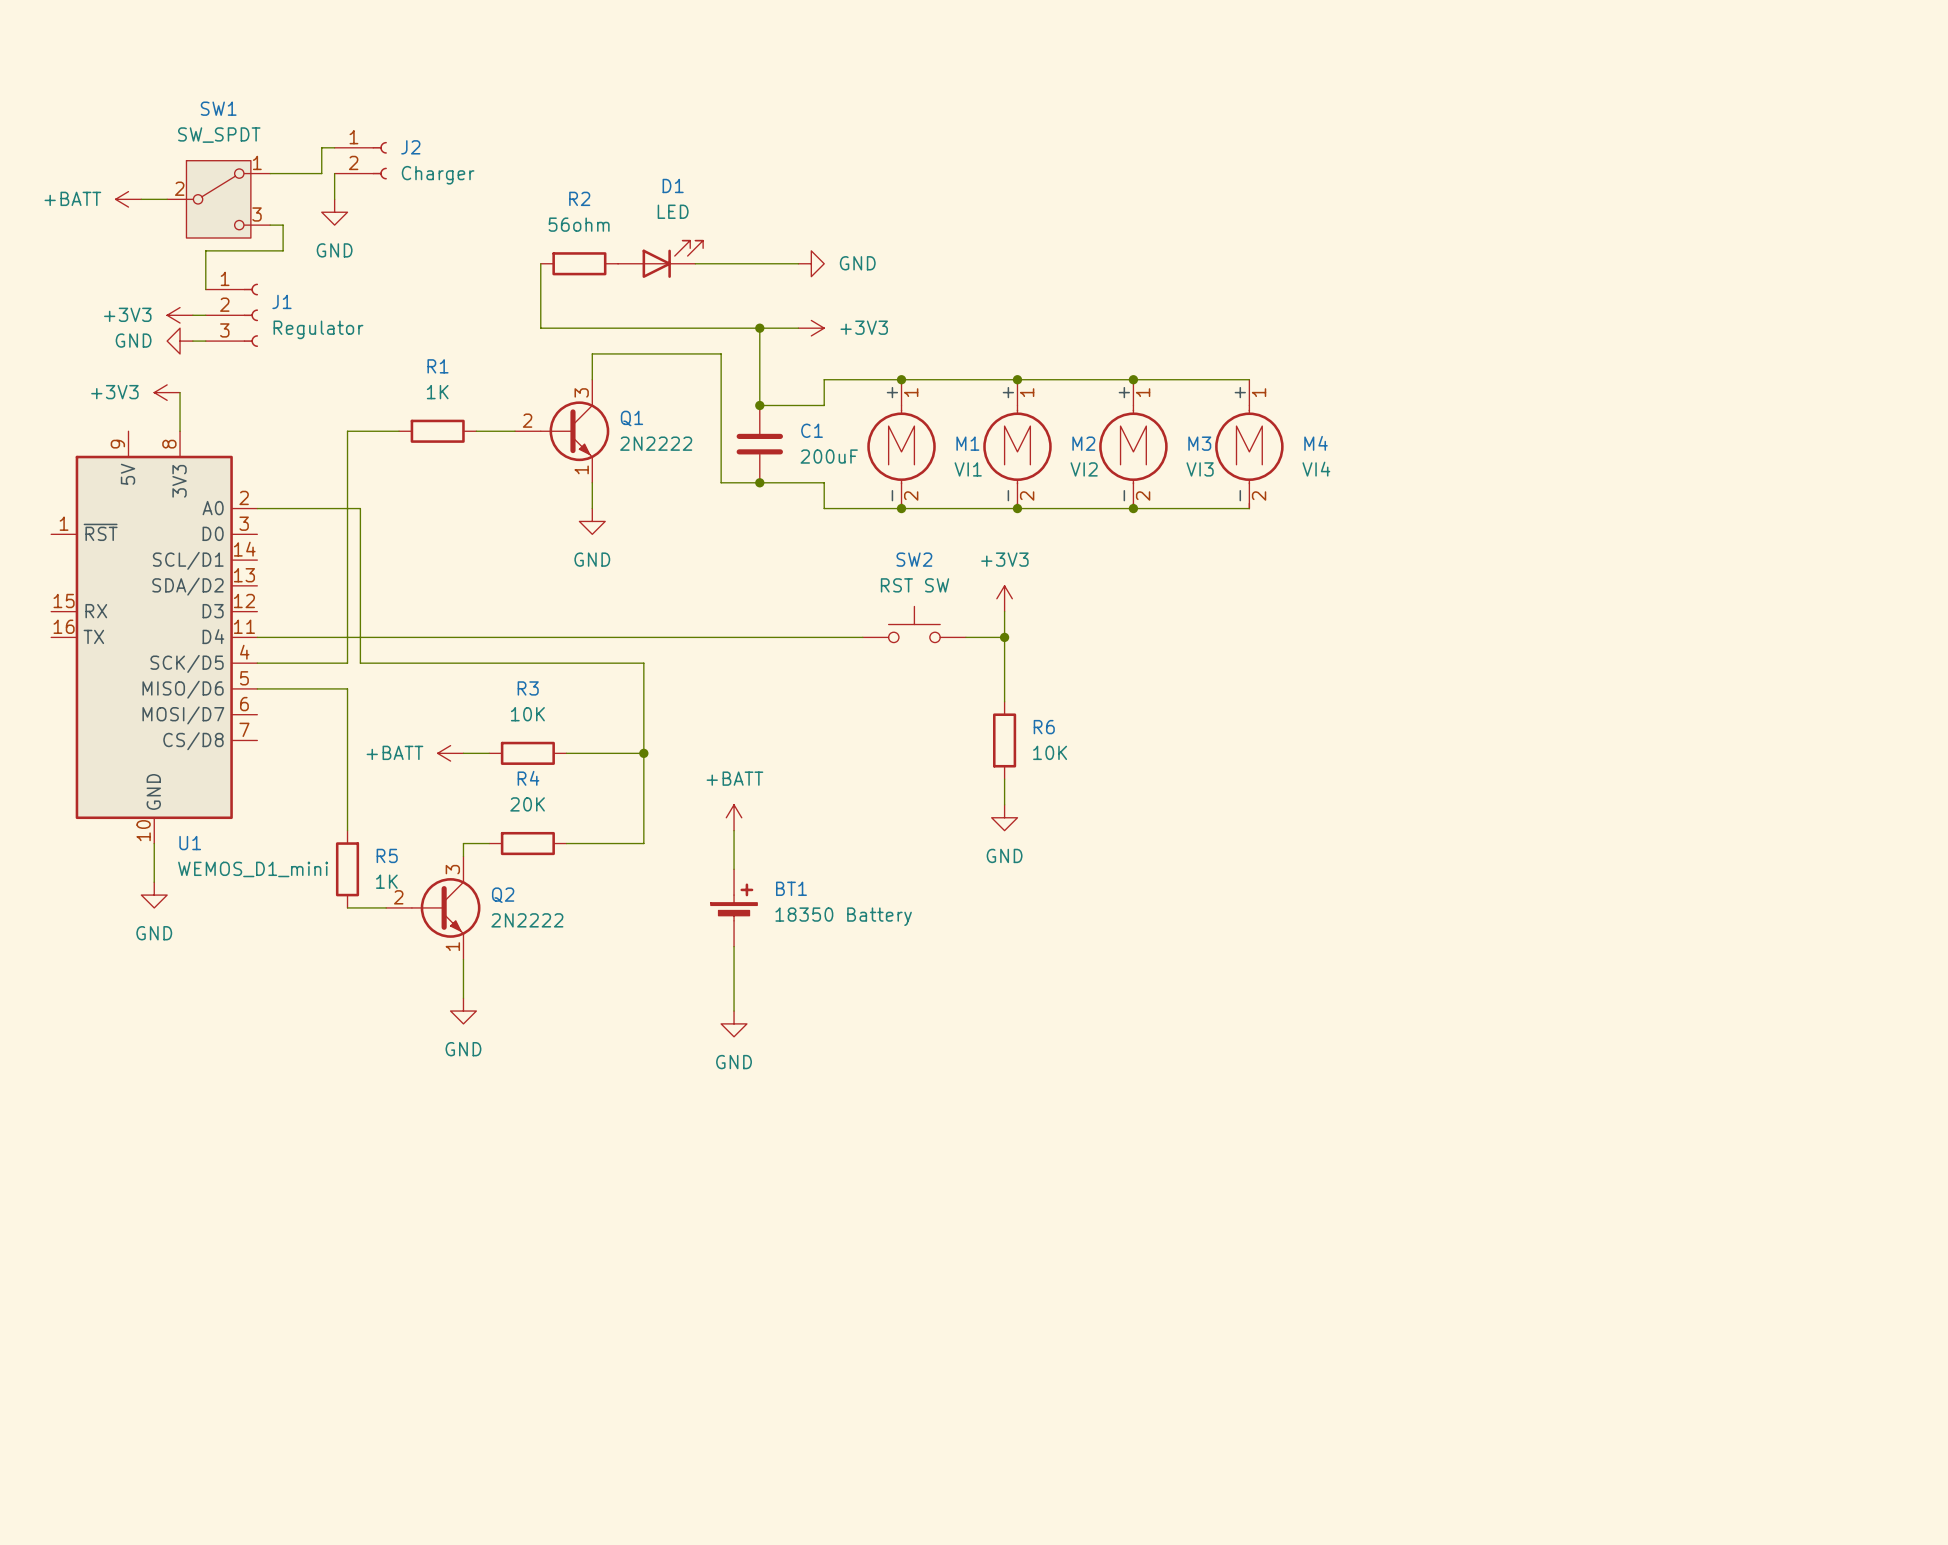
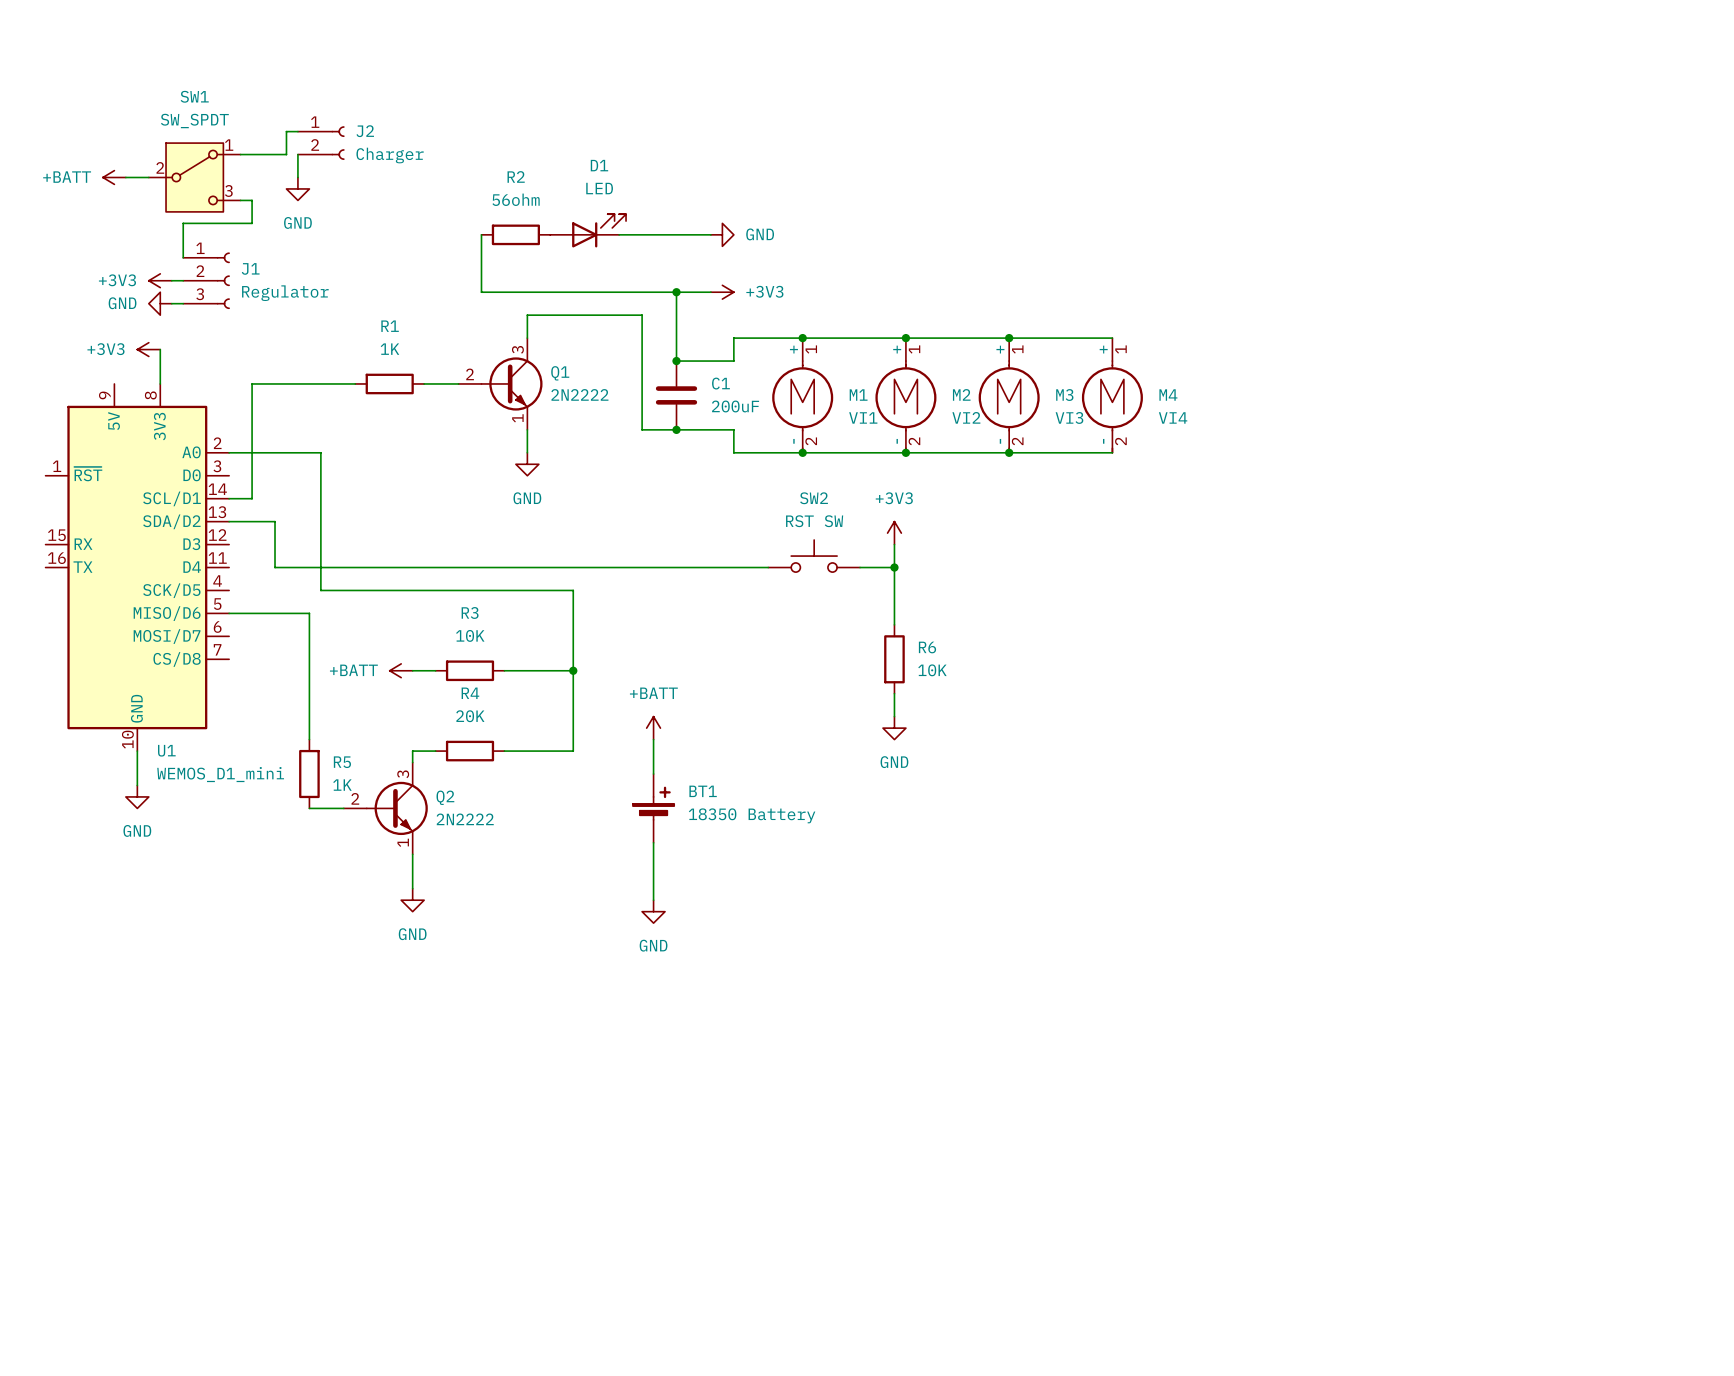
wire: (347, 431) (347, 663) (257, 663) -> (309, 383) (252, 383) (252, 498) (229, 498)
wire: (257, 637) (308, 637) -> (229, 521) (275, 521) (275, 567)

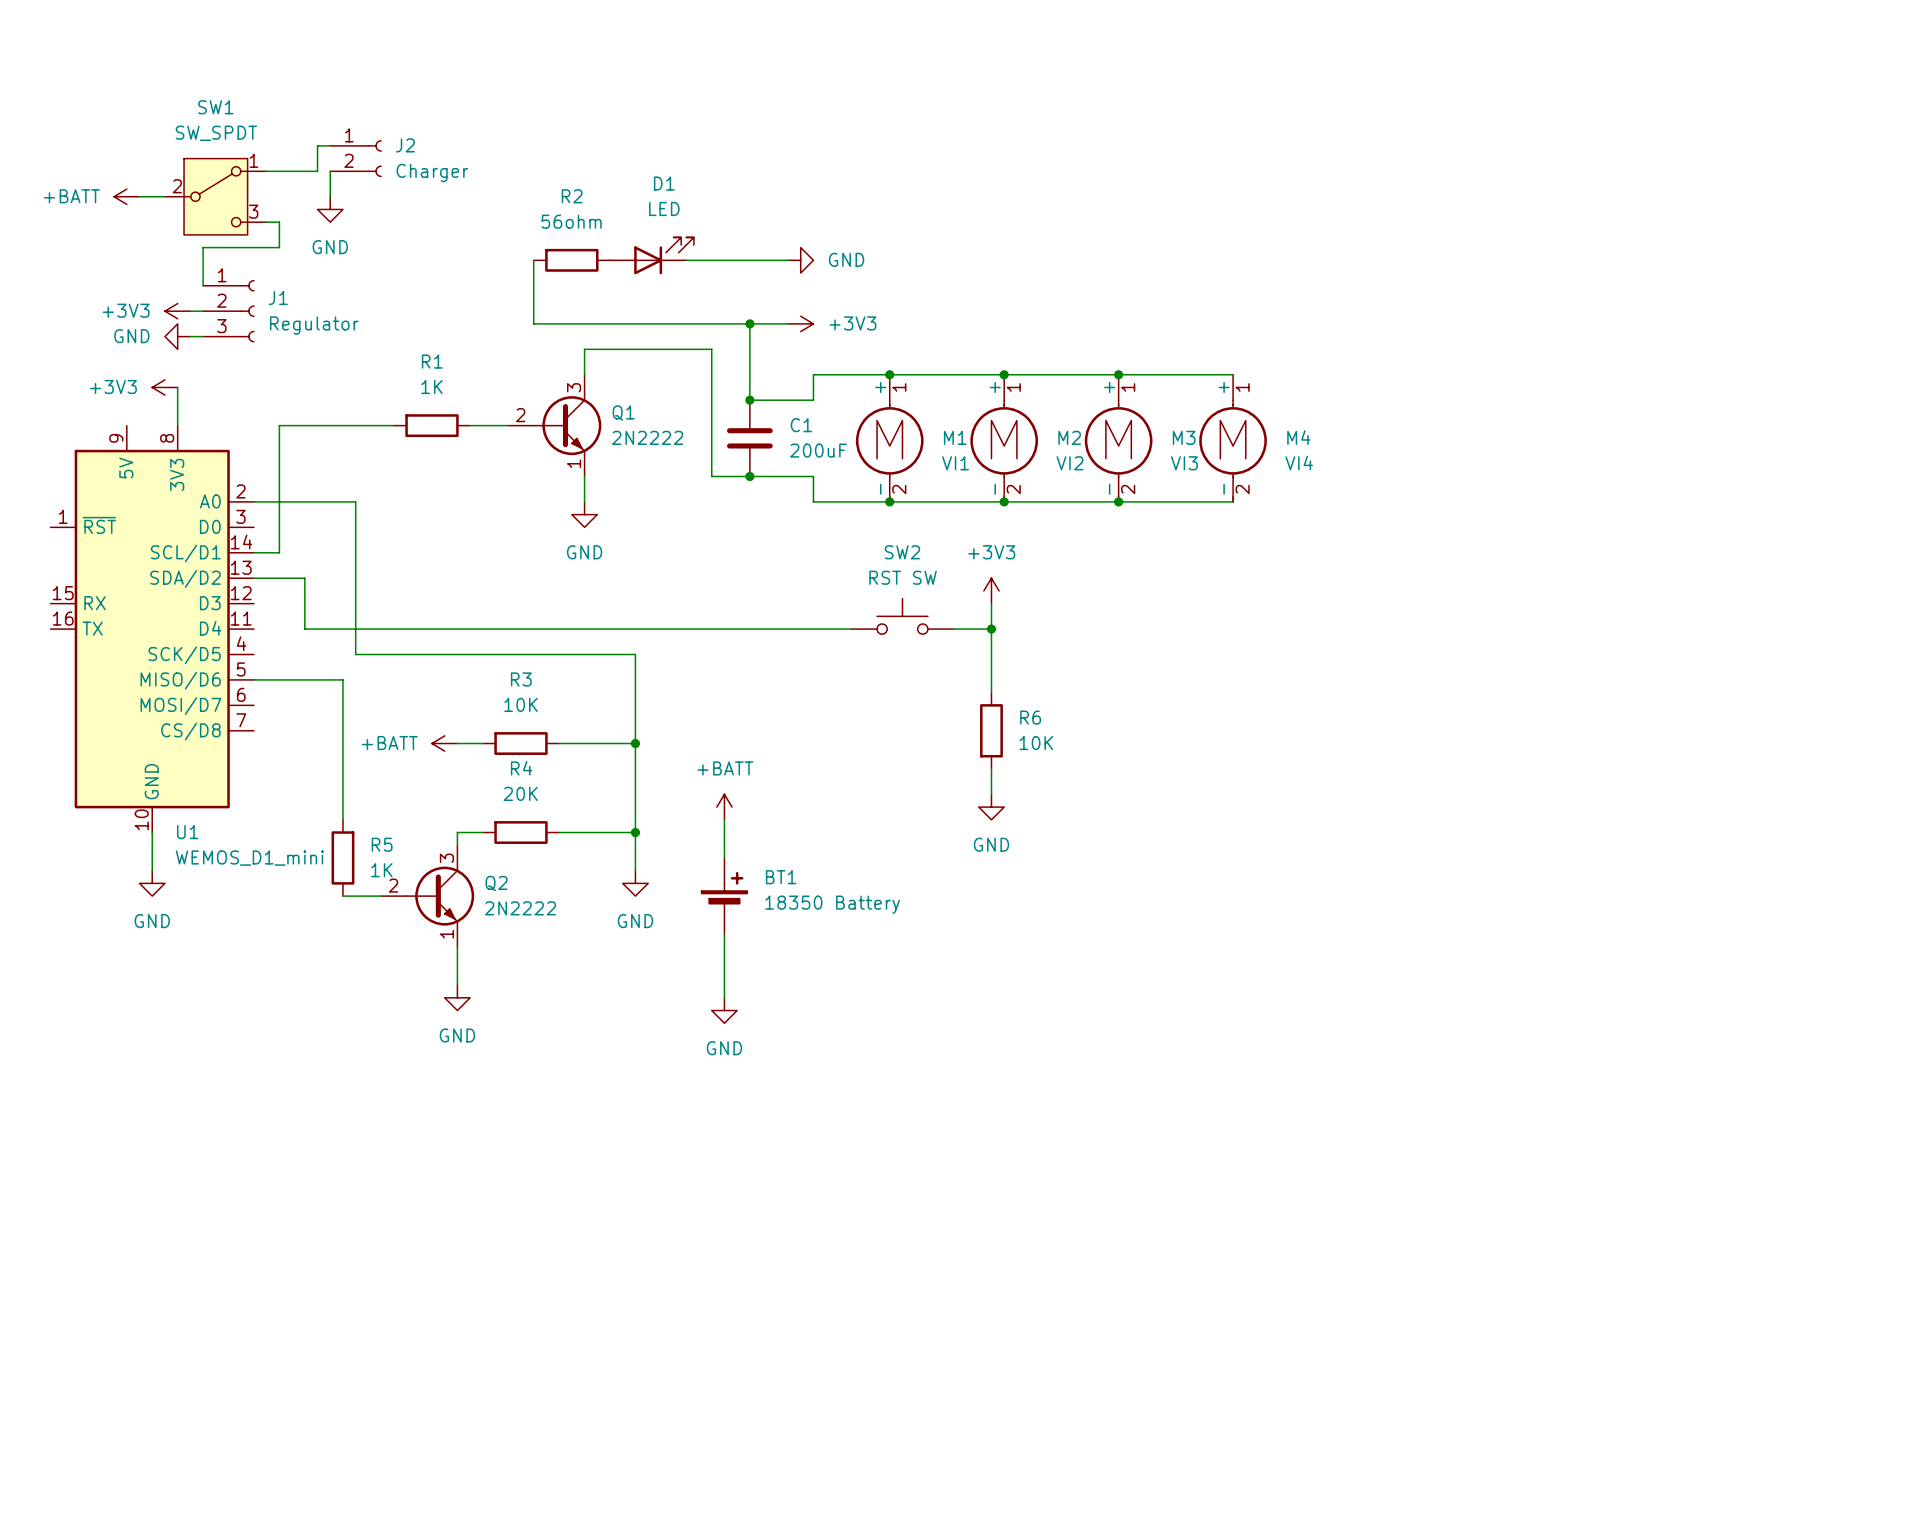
wire: none -> (635, 832) (635, 870)
junction: none -> (635, 832)
power symbol: none -> GND (635, 883)

